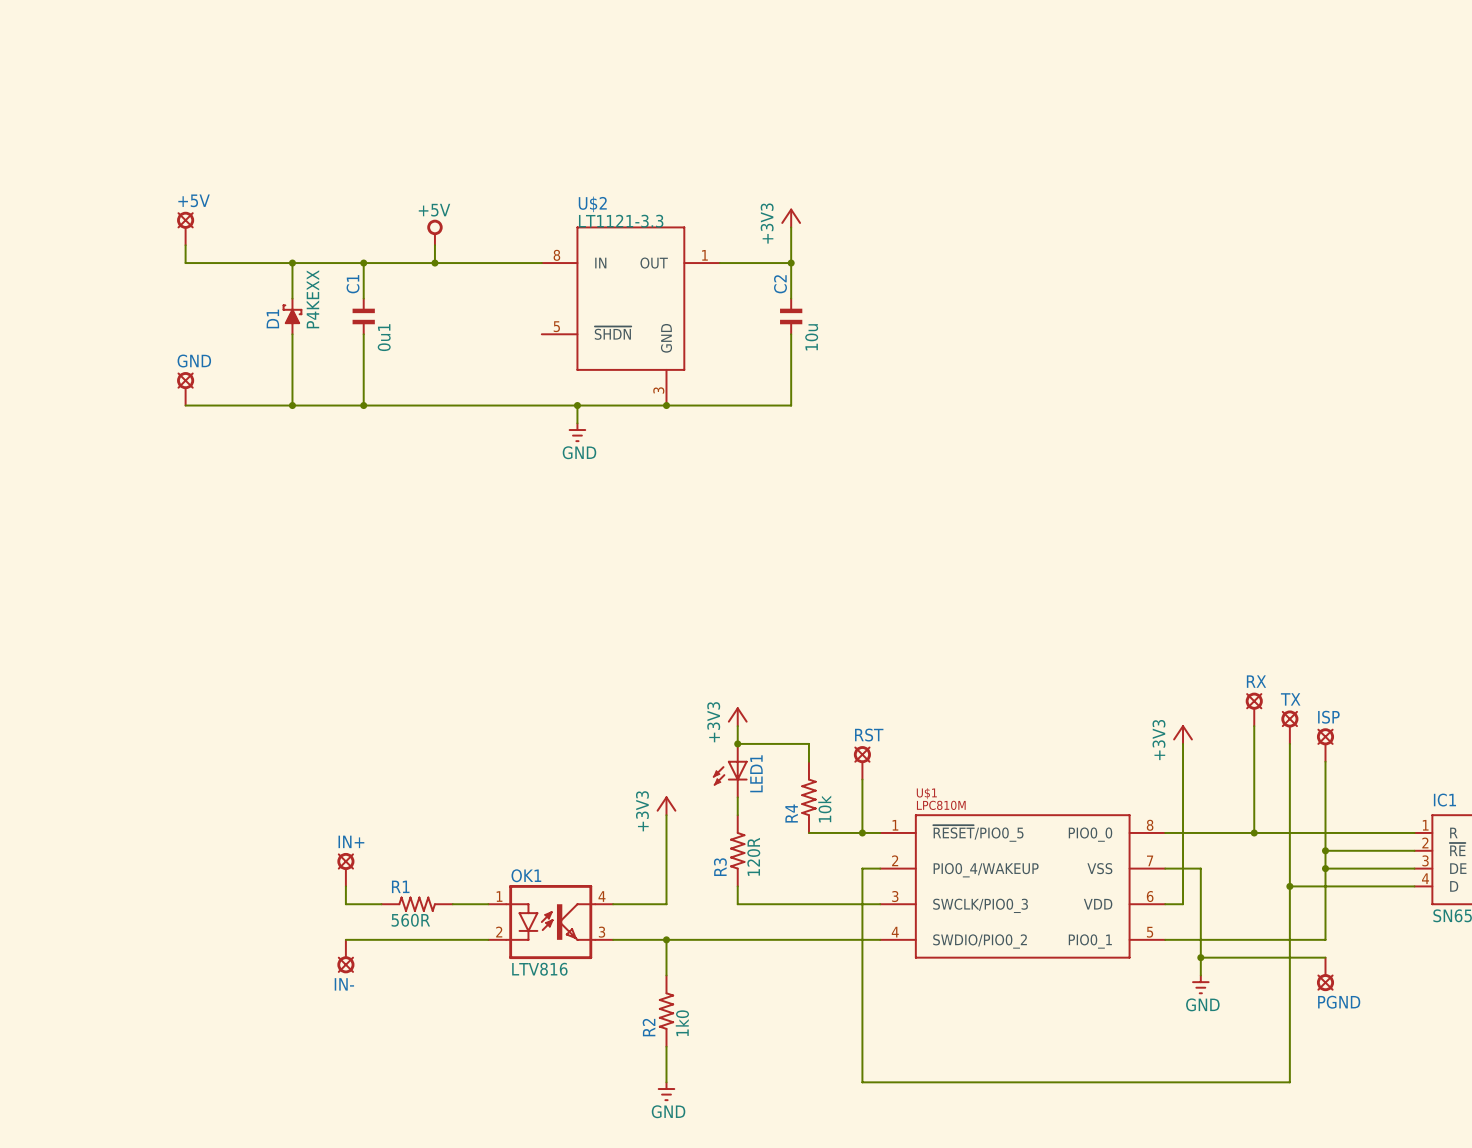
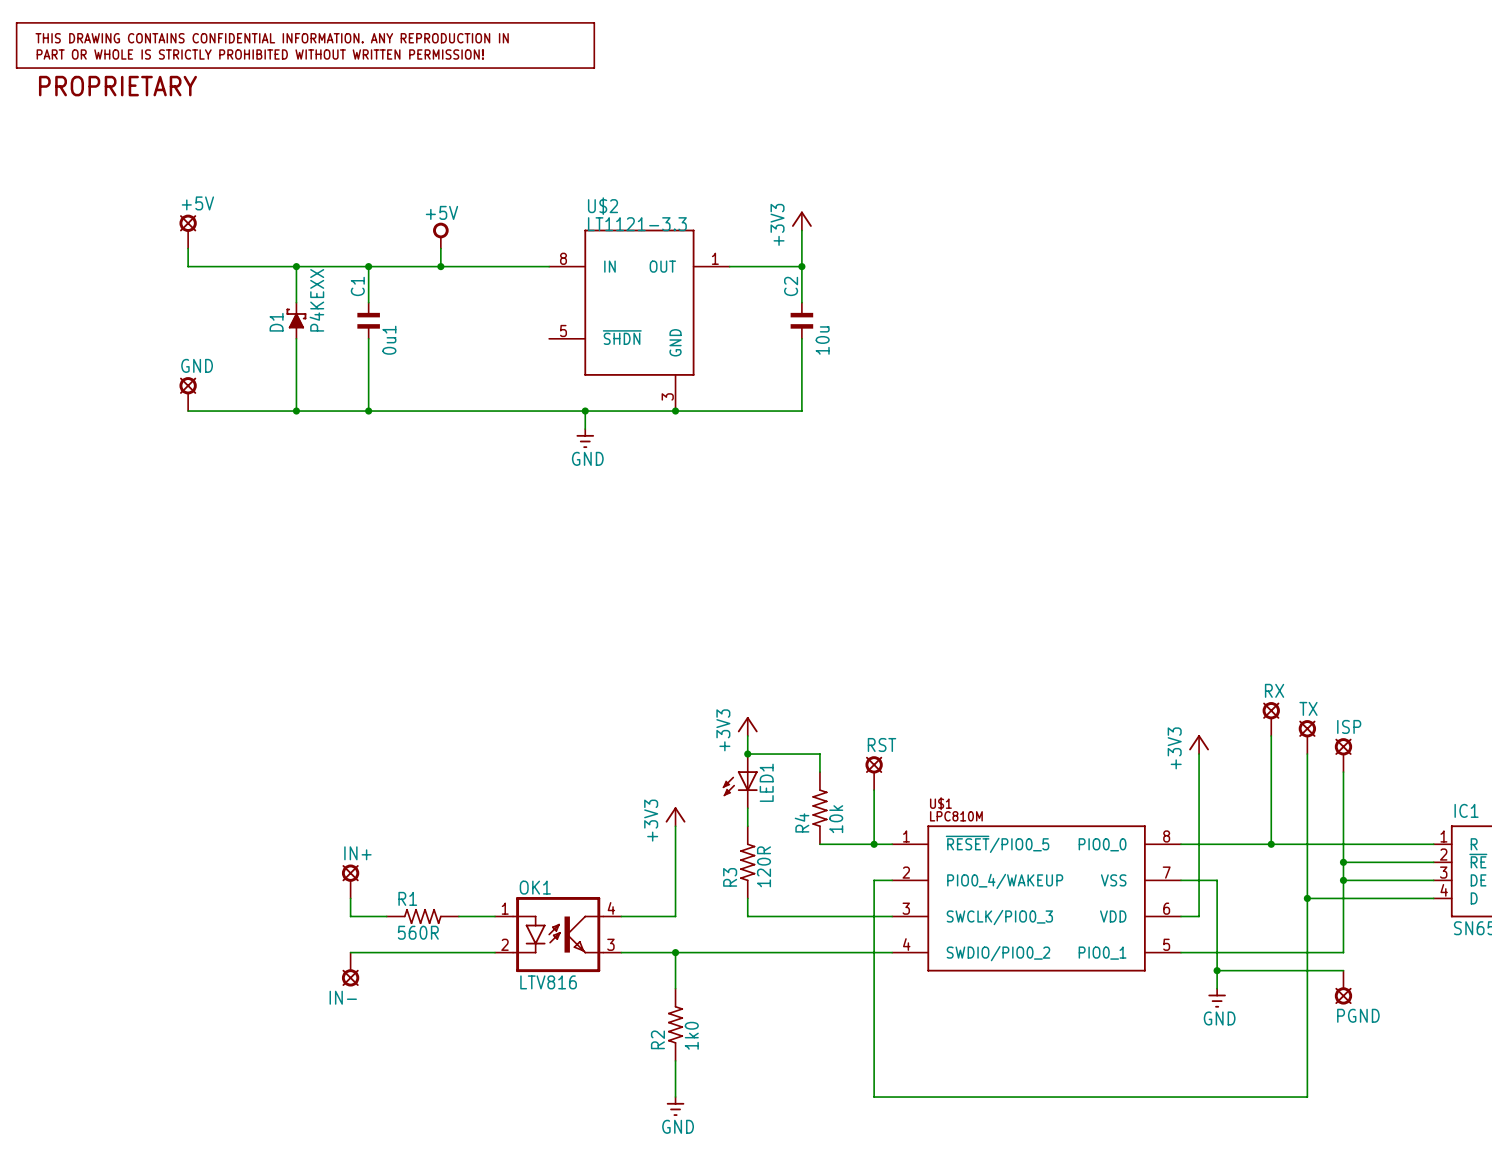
part: none -> (305, 45)

